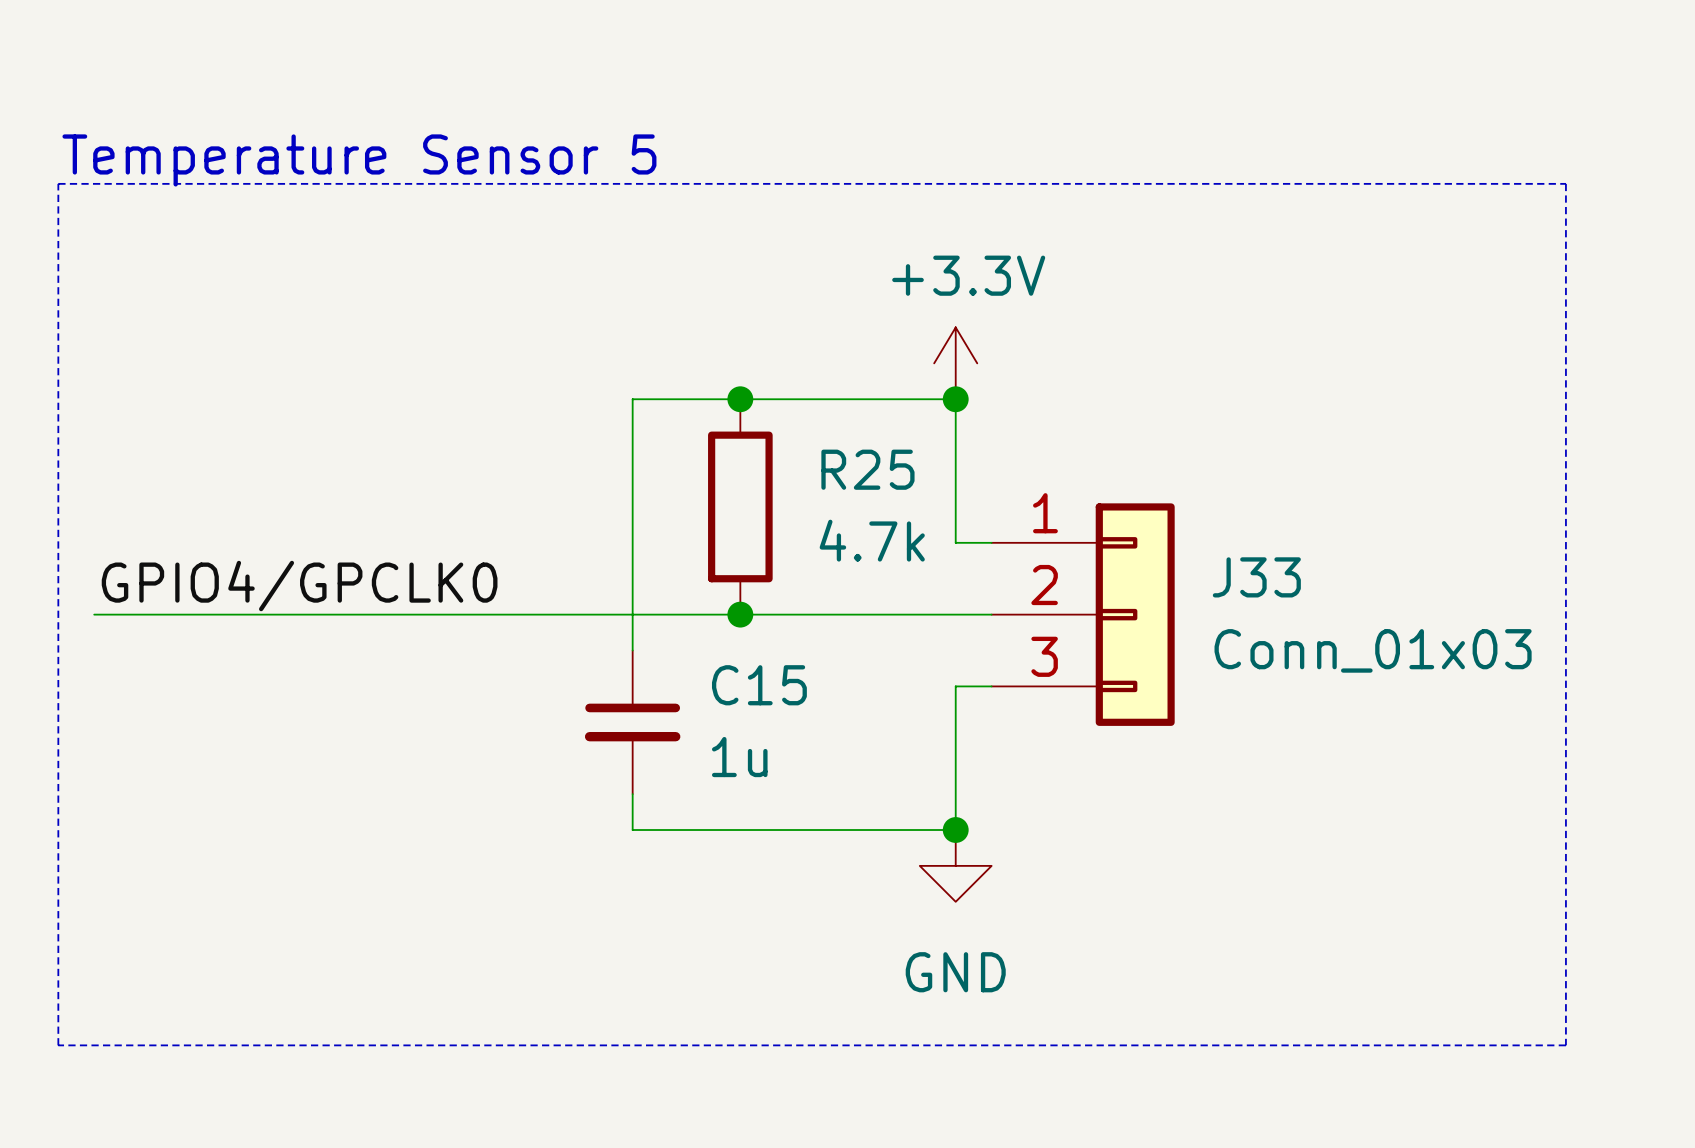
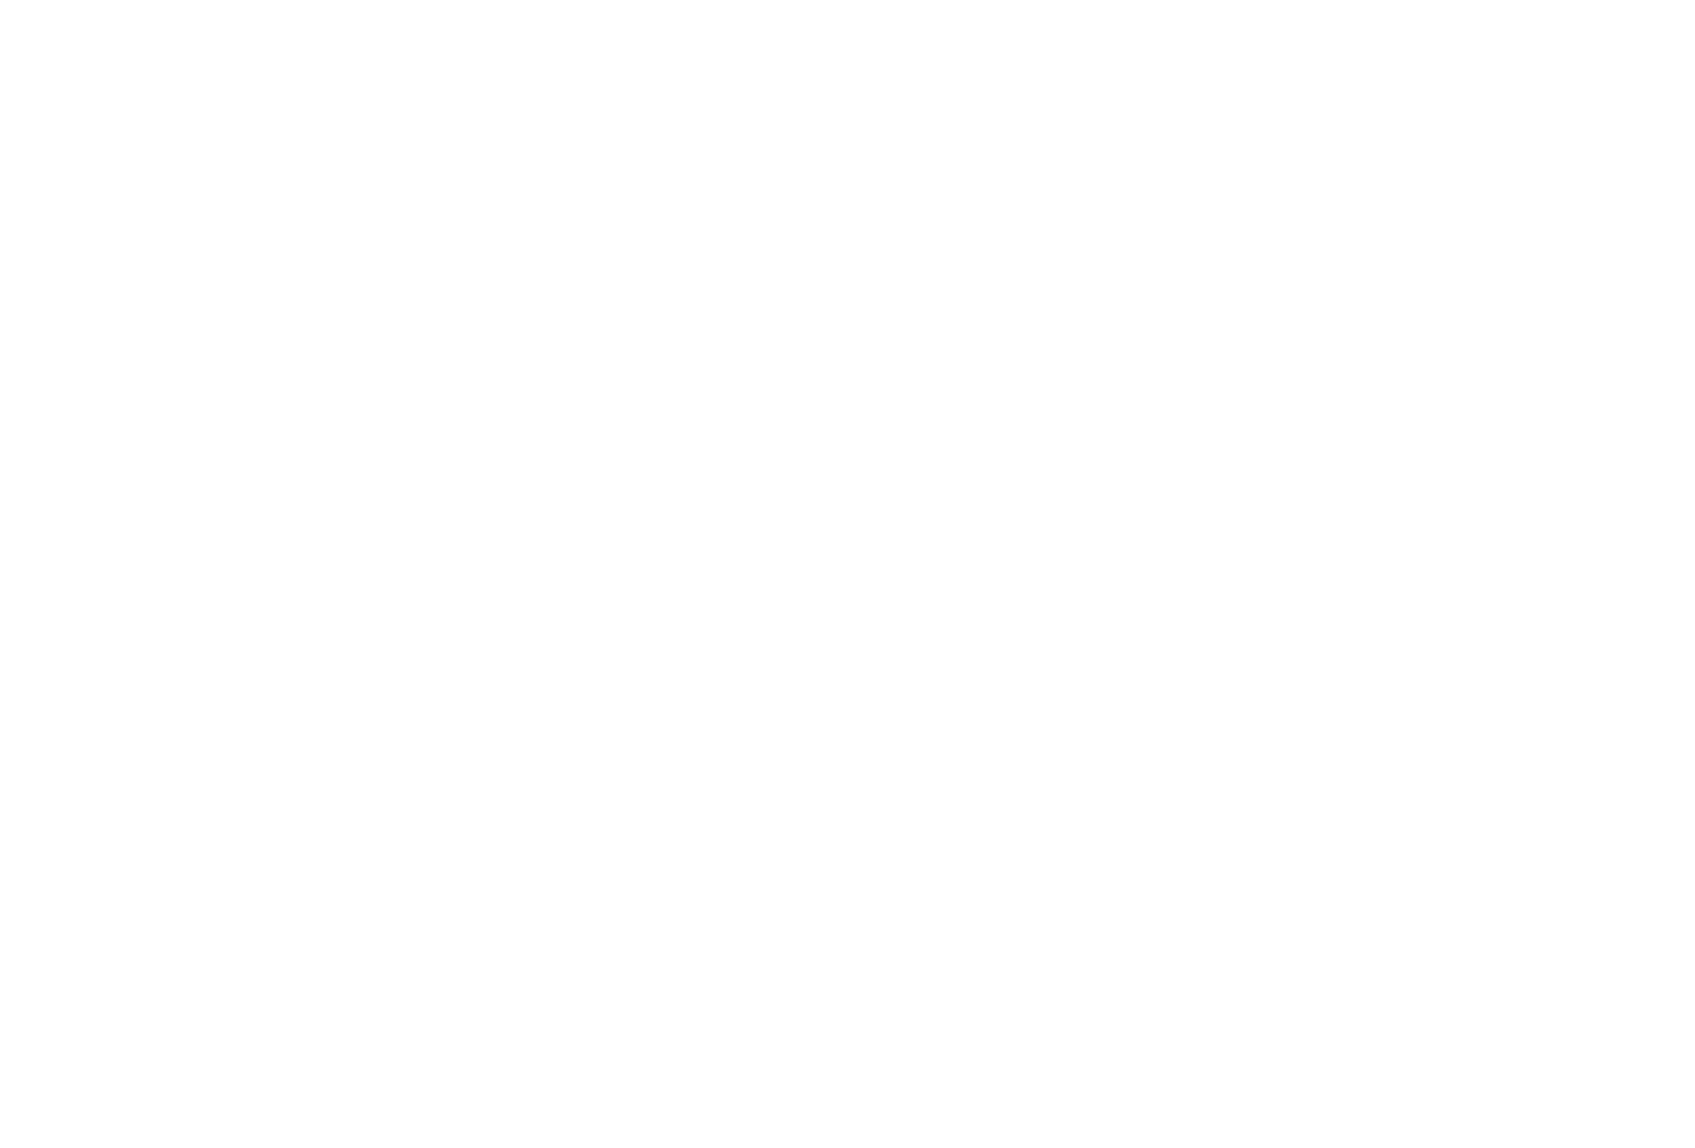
text: Temperature Sensor 5 (359, 160) -> none
line: (58, 183) (1565, 183) (1565, 1045) (58, 1045) (58, 183) -> none
power symbol: +3.3V (955, 363) -> none
junction: (740, 399) -> none
junction: (955, 399) -> none
R25: 4.7k (740, 506) -> none
wire: (991, 542) (955, 542) (955, 399) (632, 399) (632, 650) -> none
label: GPIO4/GPCLK0 (299, 586) -> none
wire: (94, 614) (991, 614) -> none
junction: (740, 614) -> none
J33: Conn_01x03 (1083, 614) -> none
wire: (991, 686) (955, 686) (955, 830) (632, 830) (632, 794) -> none
C15: 1u (632, 722) -> none
junction: (955, 830) -> none
power symbol: GND (955, 865) -> none

